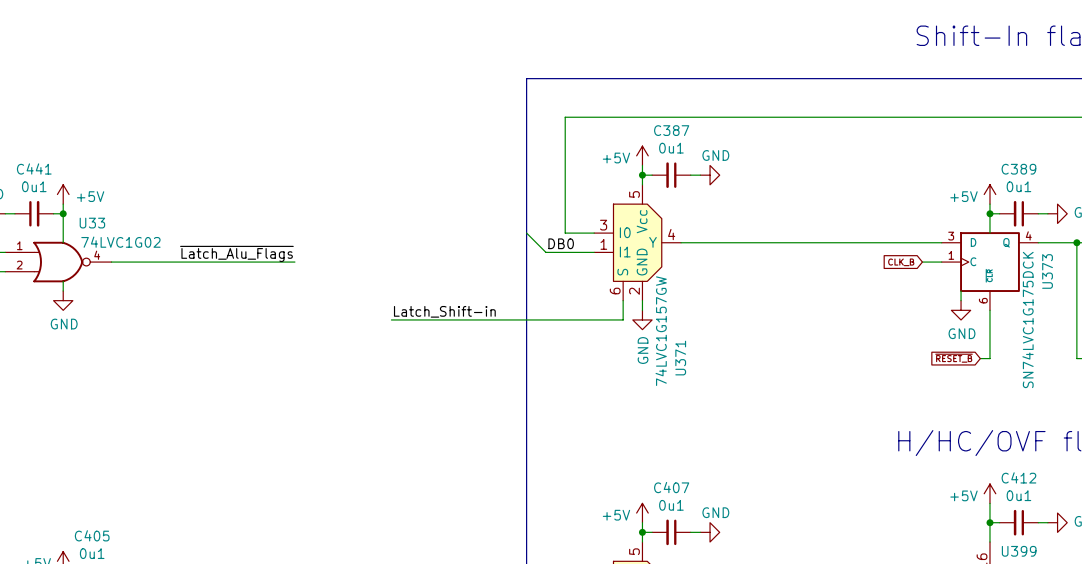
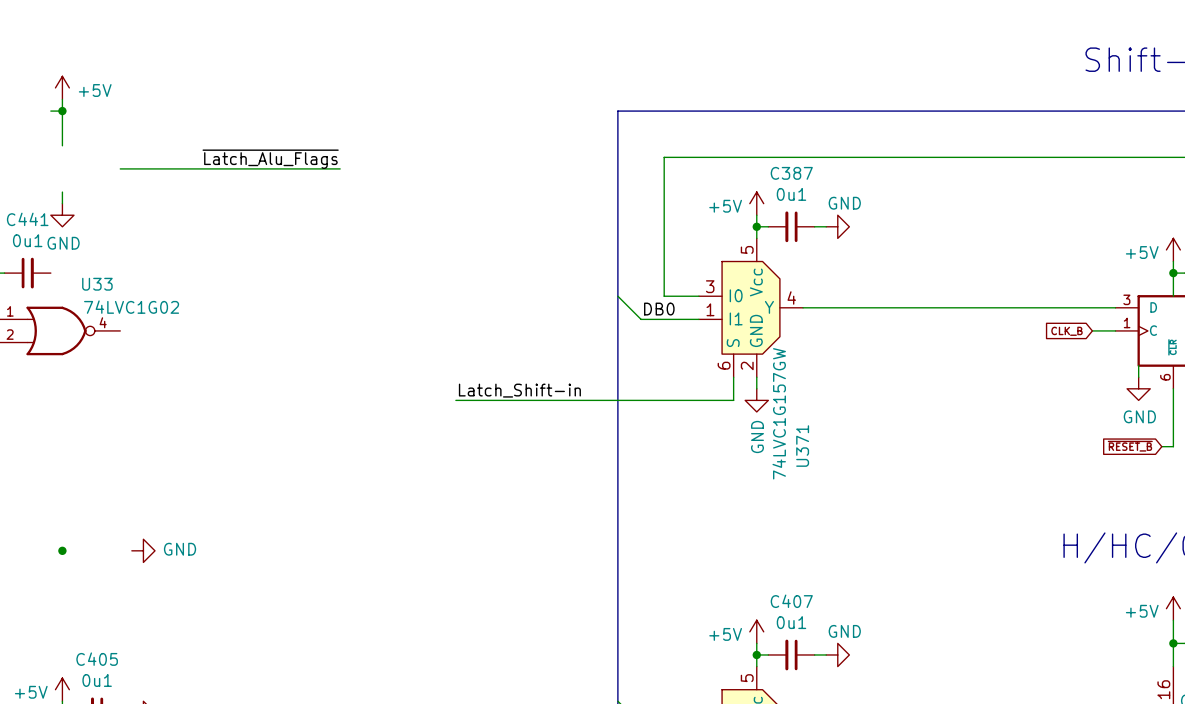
junction: none -> (62, 111)
power symbol: none -> GND (62, 215)
power symbol position: +5V (63, 194) -> +5V (62, 87)
wire: (63, 204) (63, 242) -> (62, 99) (62, 145)
wire: (53, 213) (63, 213) -> (50, 111) (62, 111)
junction: (63, 213) -> none
label position: ~{Latch_Alu_Flags} (236, 253) -> ~{Latch_Alu_Flags} (270, 159)
wire: (111, 262) (294, 262) -> (120, 168) (340, 168)
wire: (63, 281) (63, 291) -> (62, 192) (62, 203)
power symbol: GND (63, 300) -> none
junction: none -> (62, 550)
power symbol: none -> GND (143, 550)

